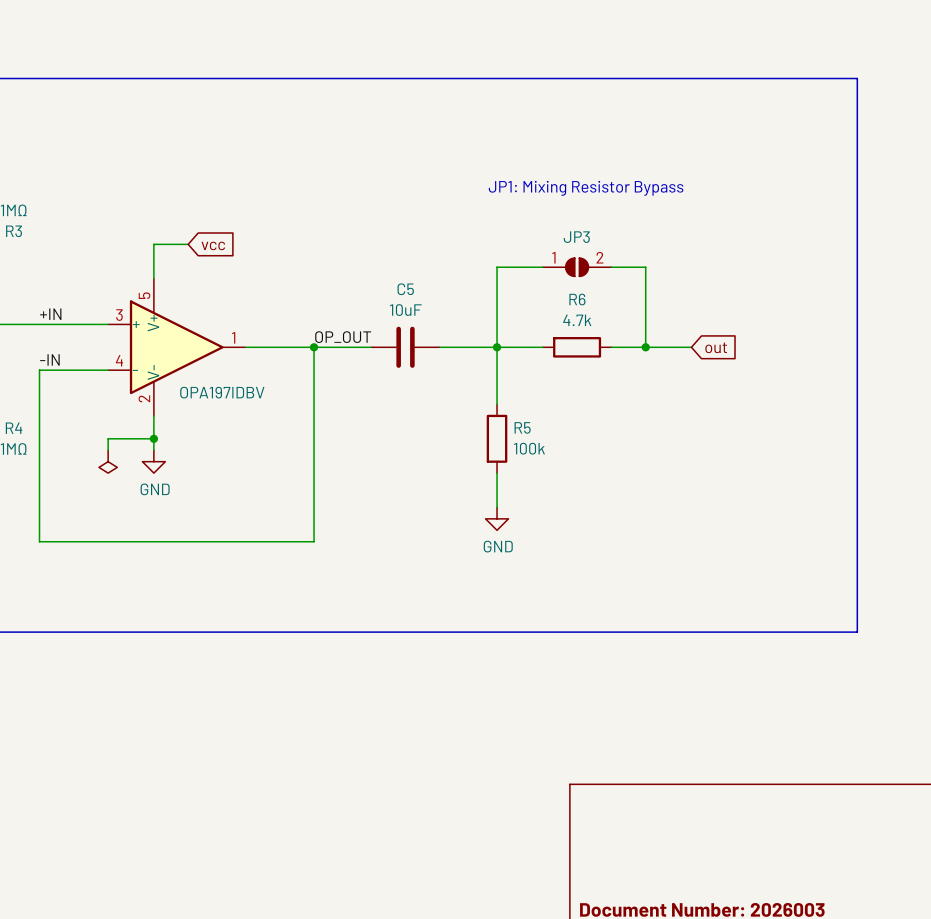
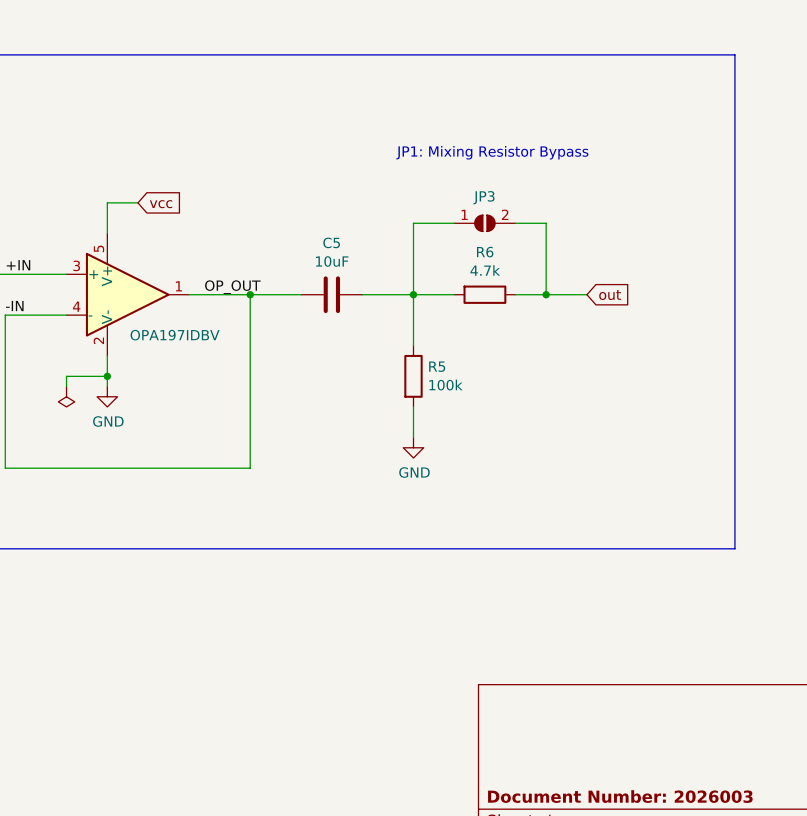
label position: OP_OUT (343, 337) -> OP_OUT (232, 287)

